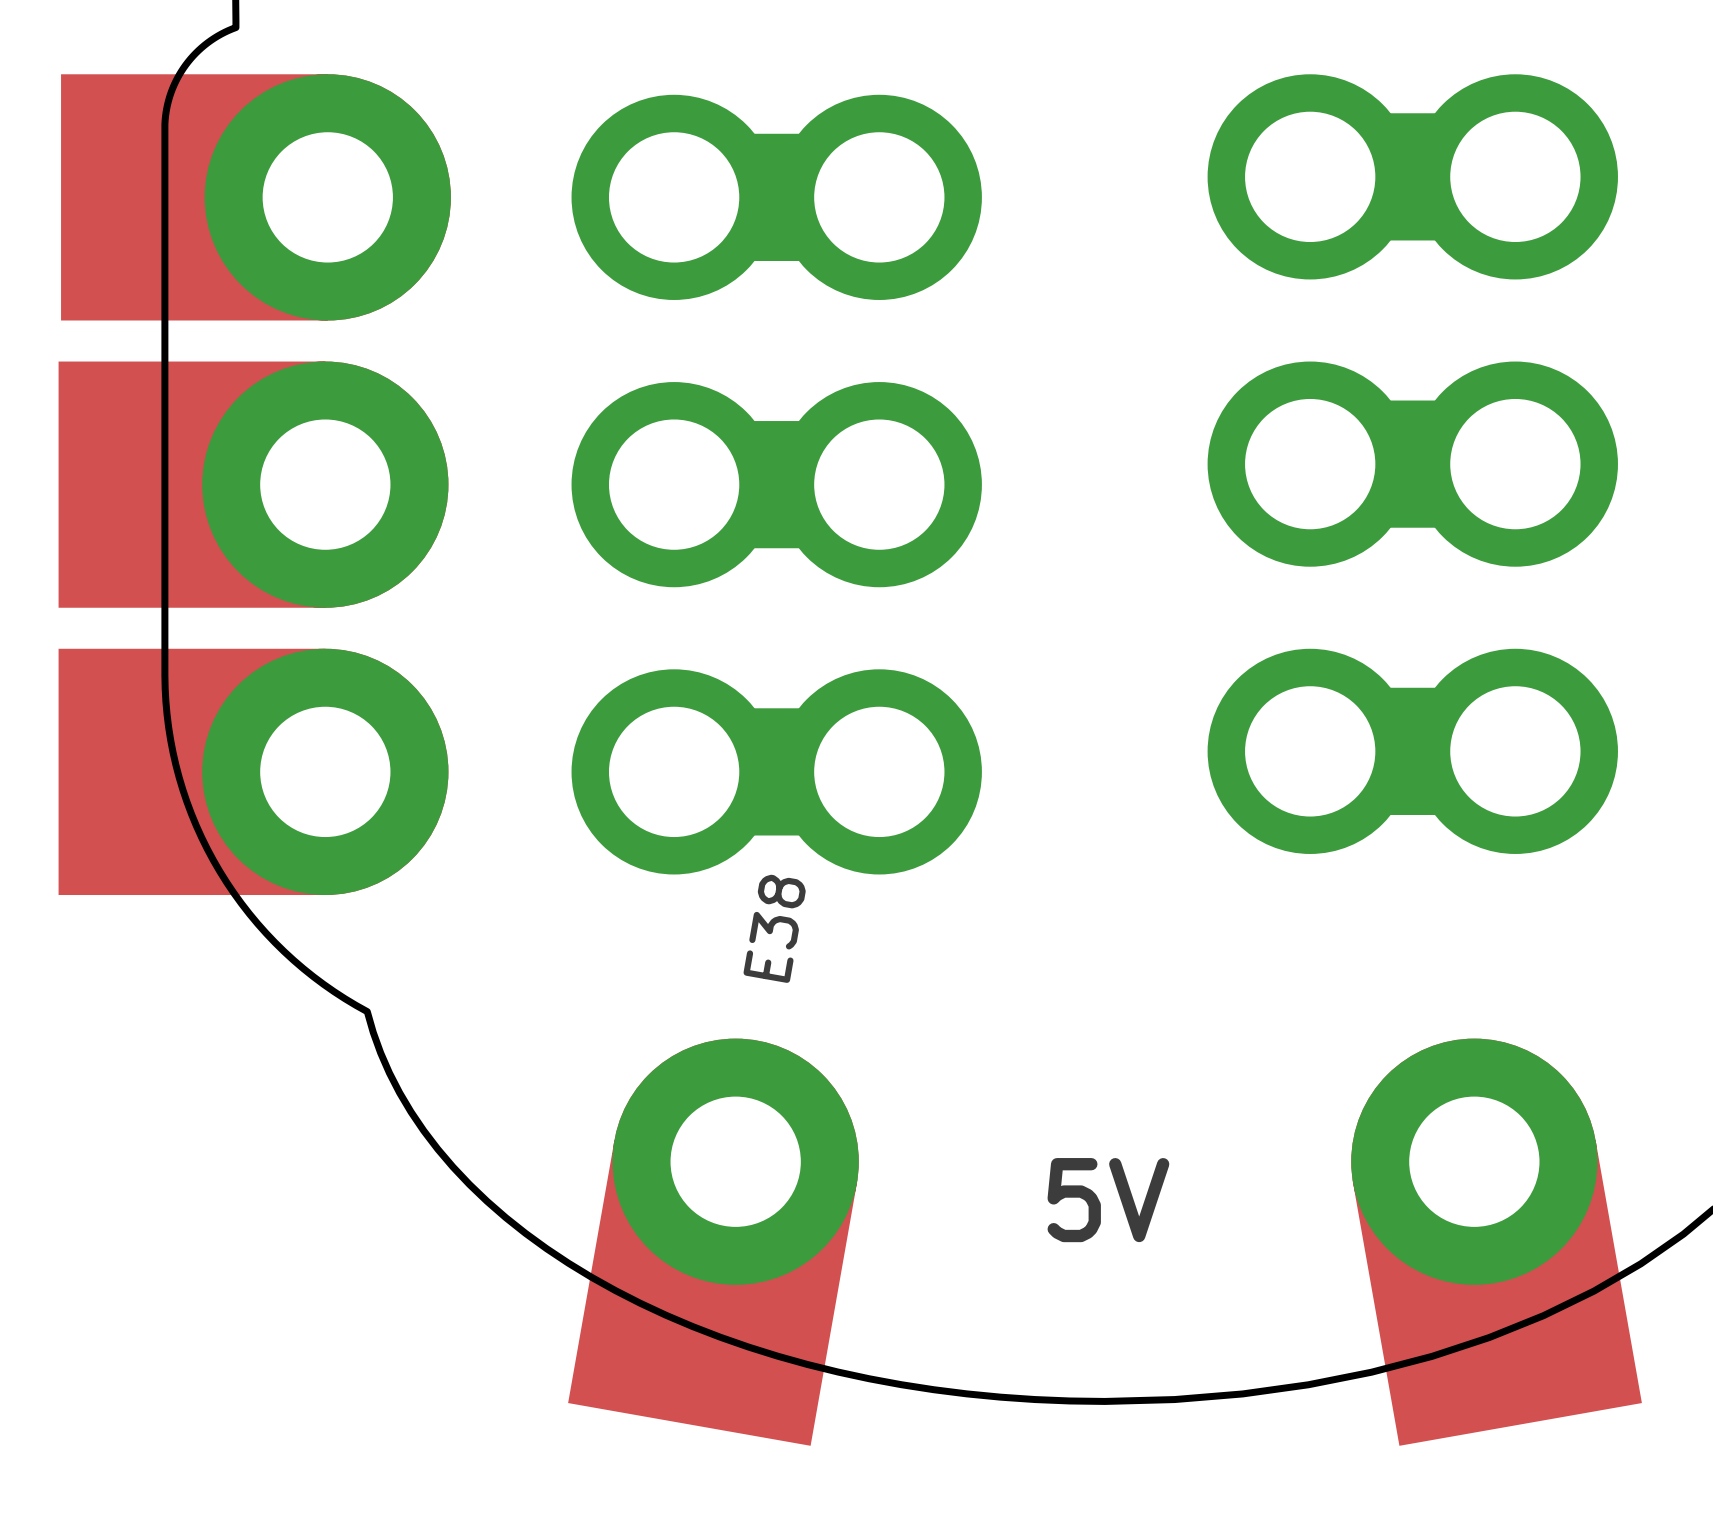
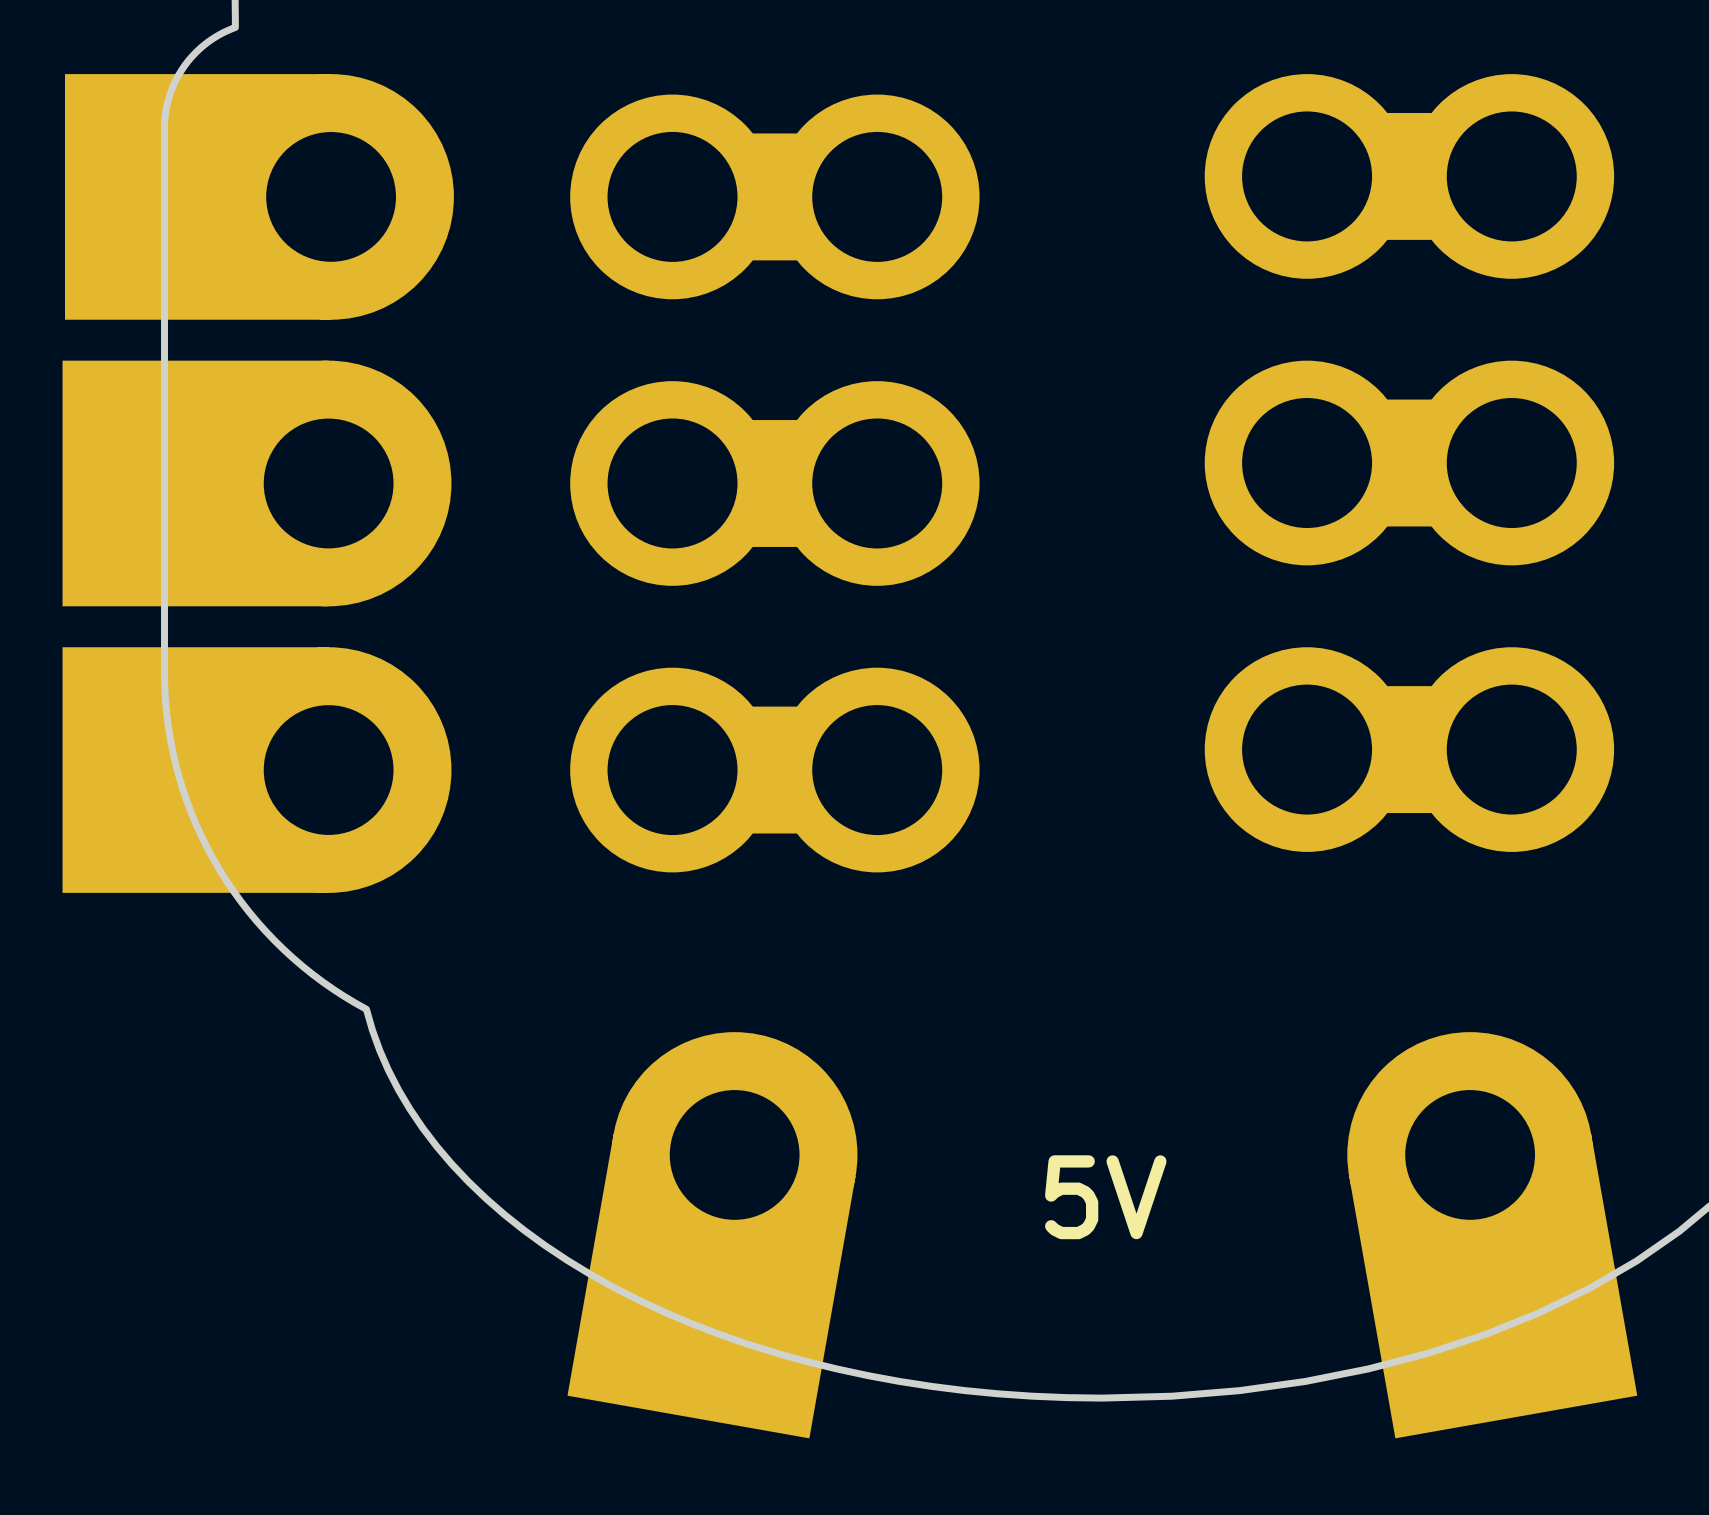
part footprint: [61, 74, 451, 321] -> [64, 74, 454, 320]
part footprint: [58, 361, 449, 608] -> [62, 360, 452, 607]
part footprint: [58, 648, 449, 896] -> [62, 647, 452, 893]
part footprint: [1351, 1038, 1642, 1446] -> [1347, 1032, 1638, 1439]
part: none -> (712, 1235)
E38: (713, 1242) -> none

